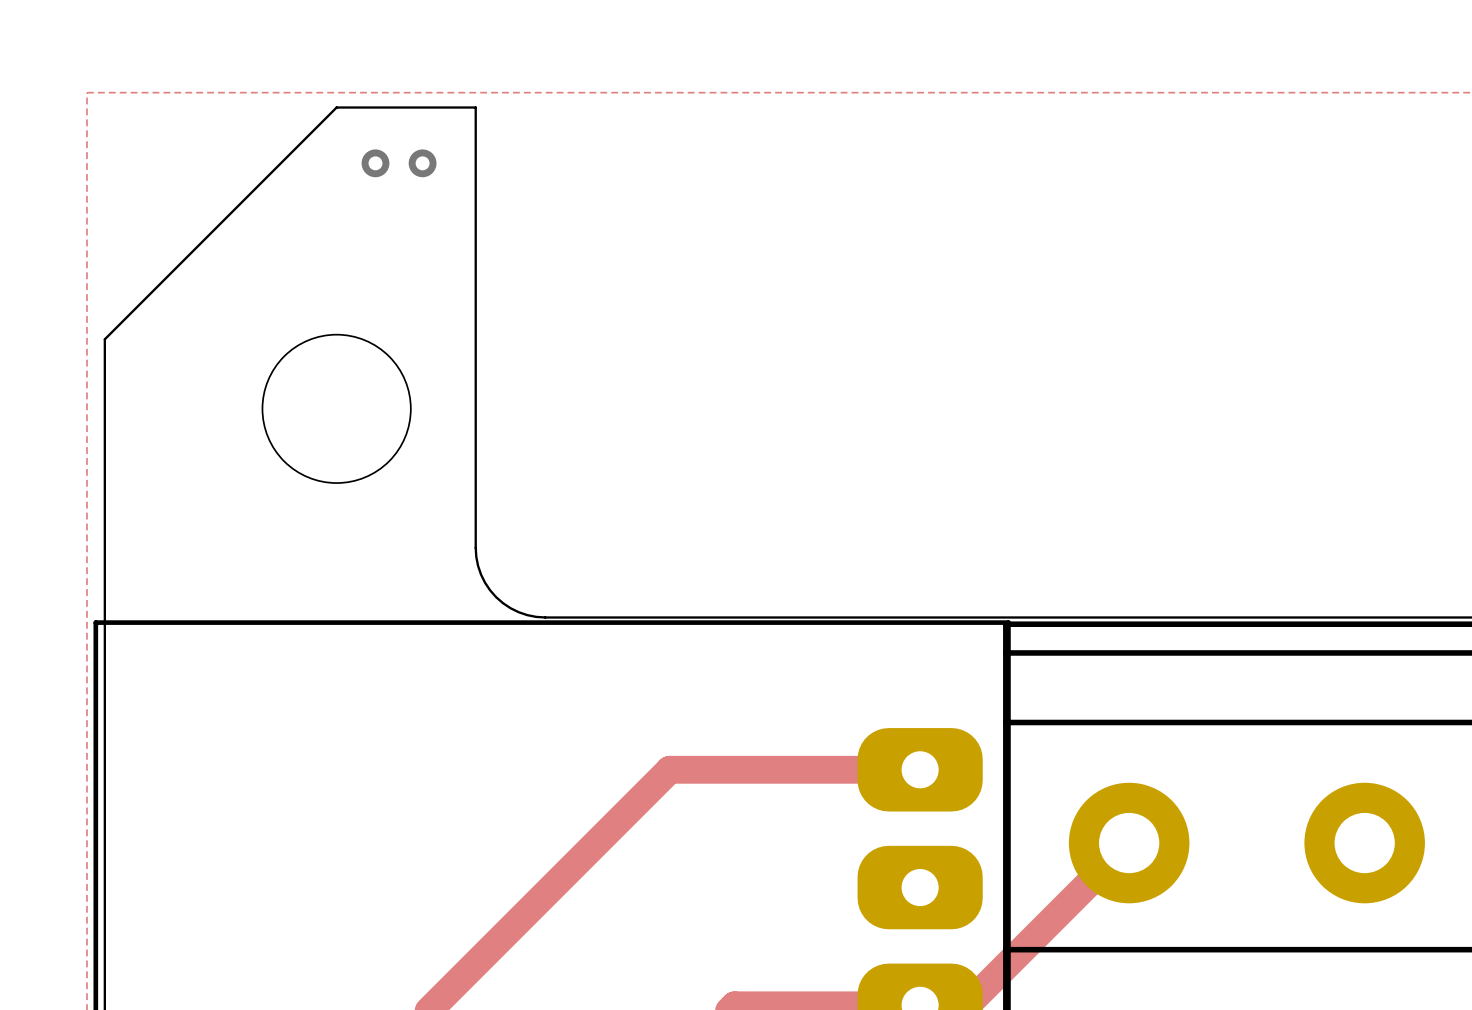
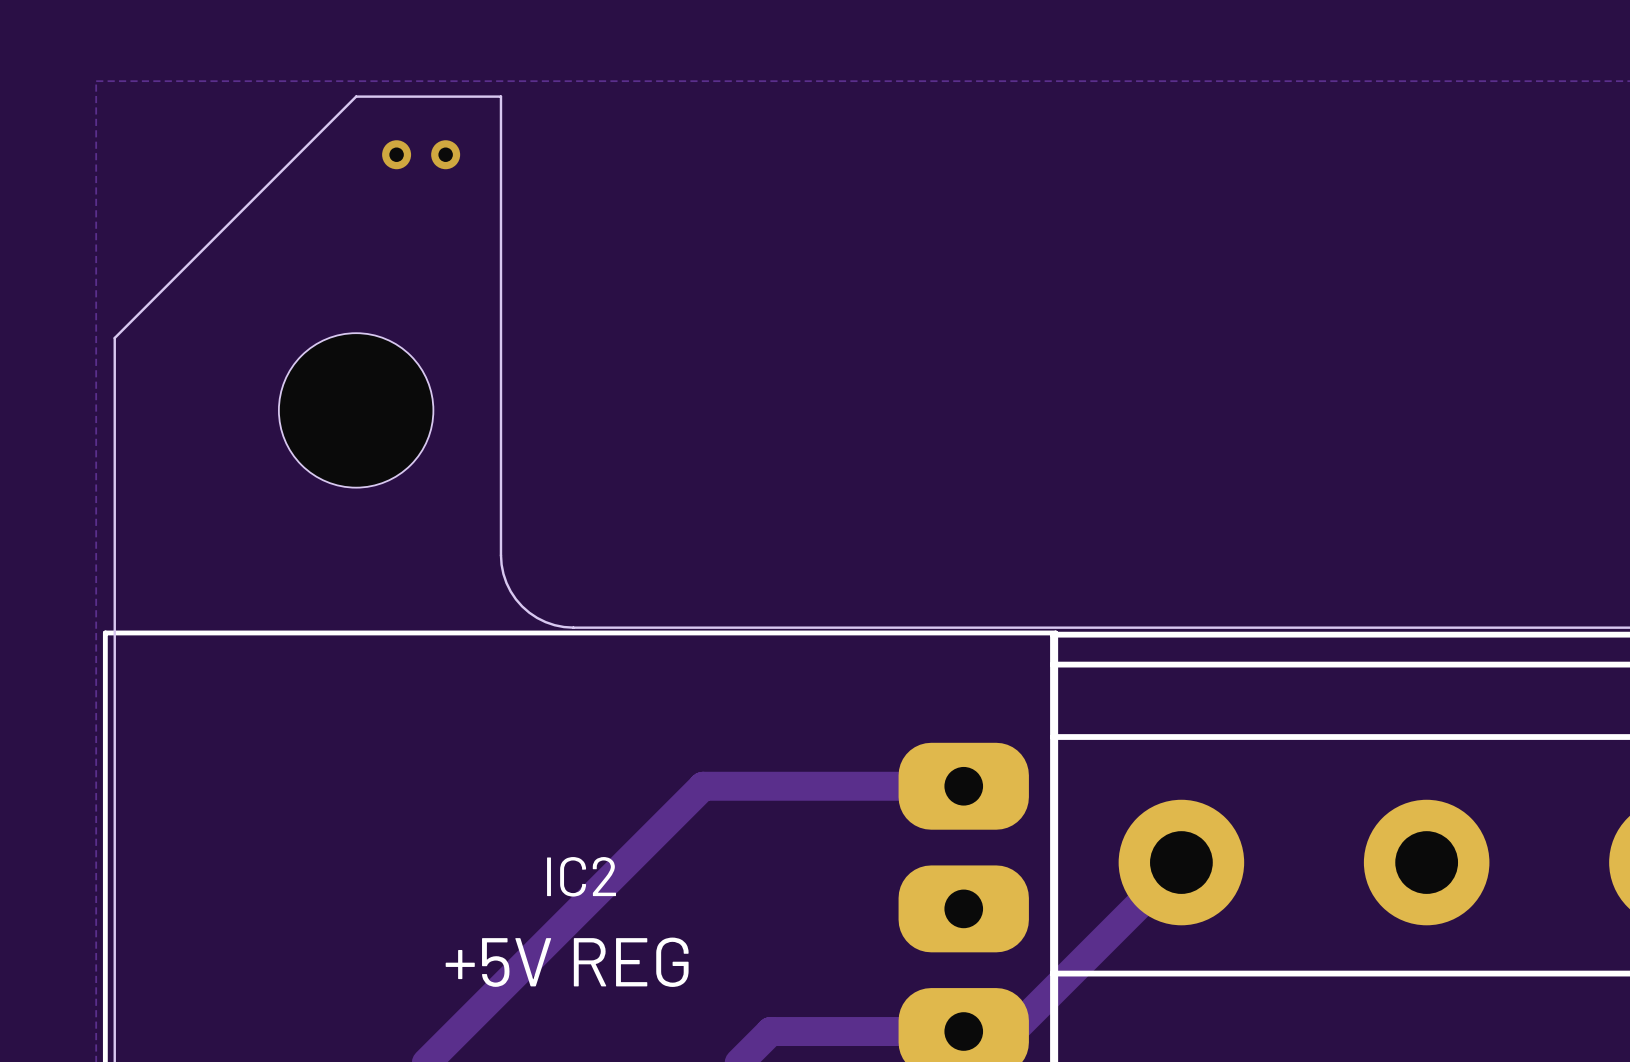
IC2 name: none -> IC2 (581, 876)
IC2 value: none -> +5V REG (567, 962)

